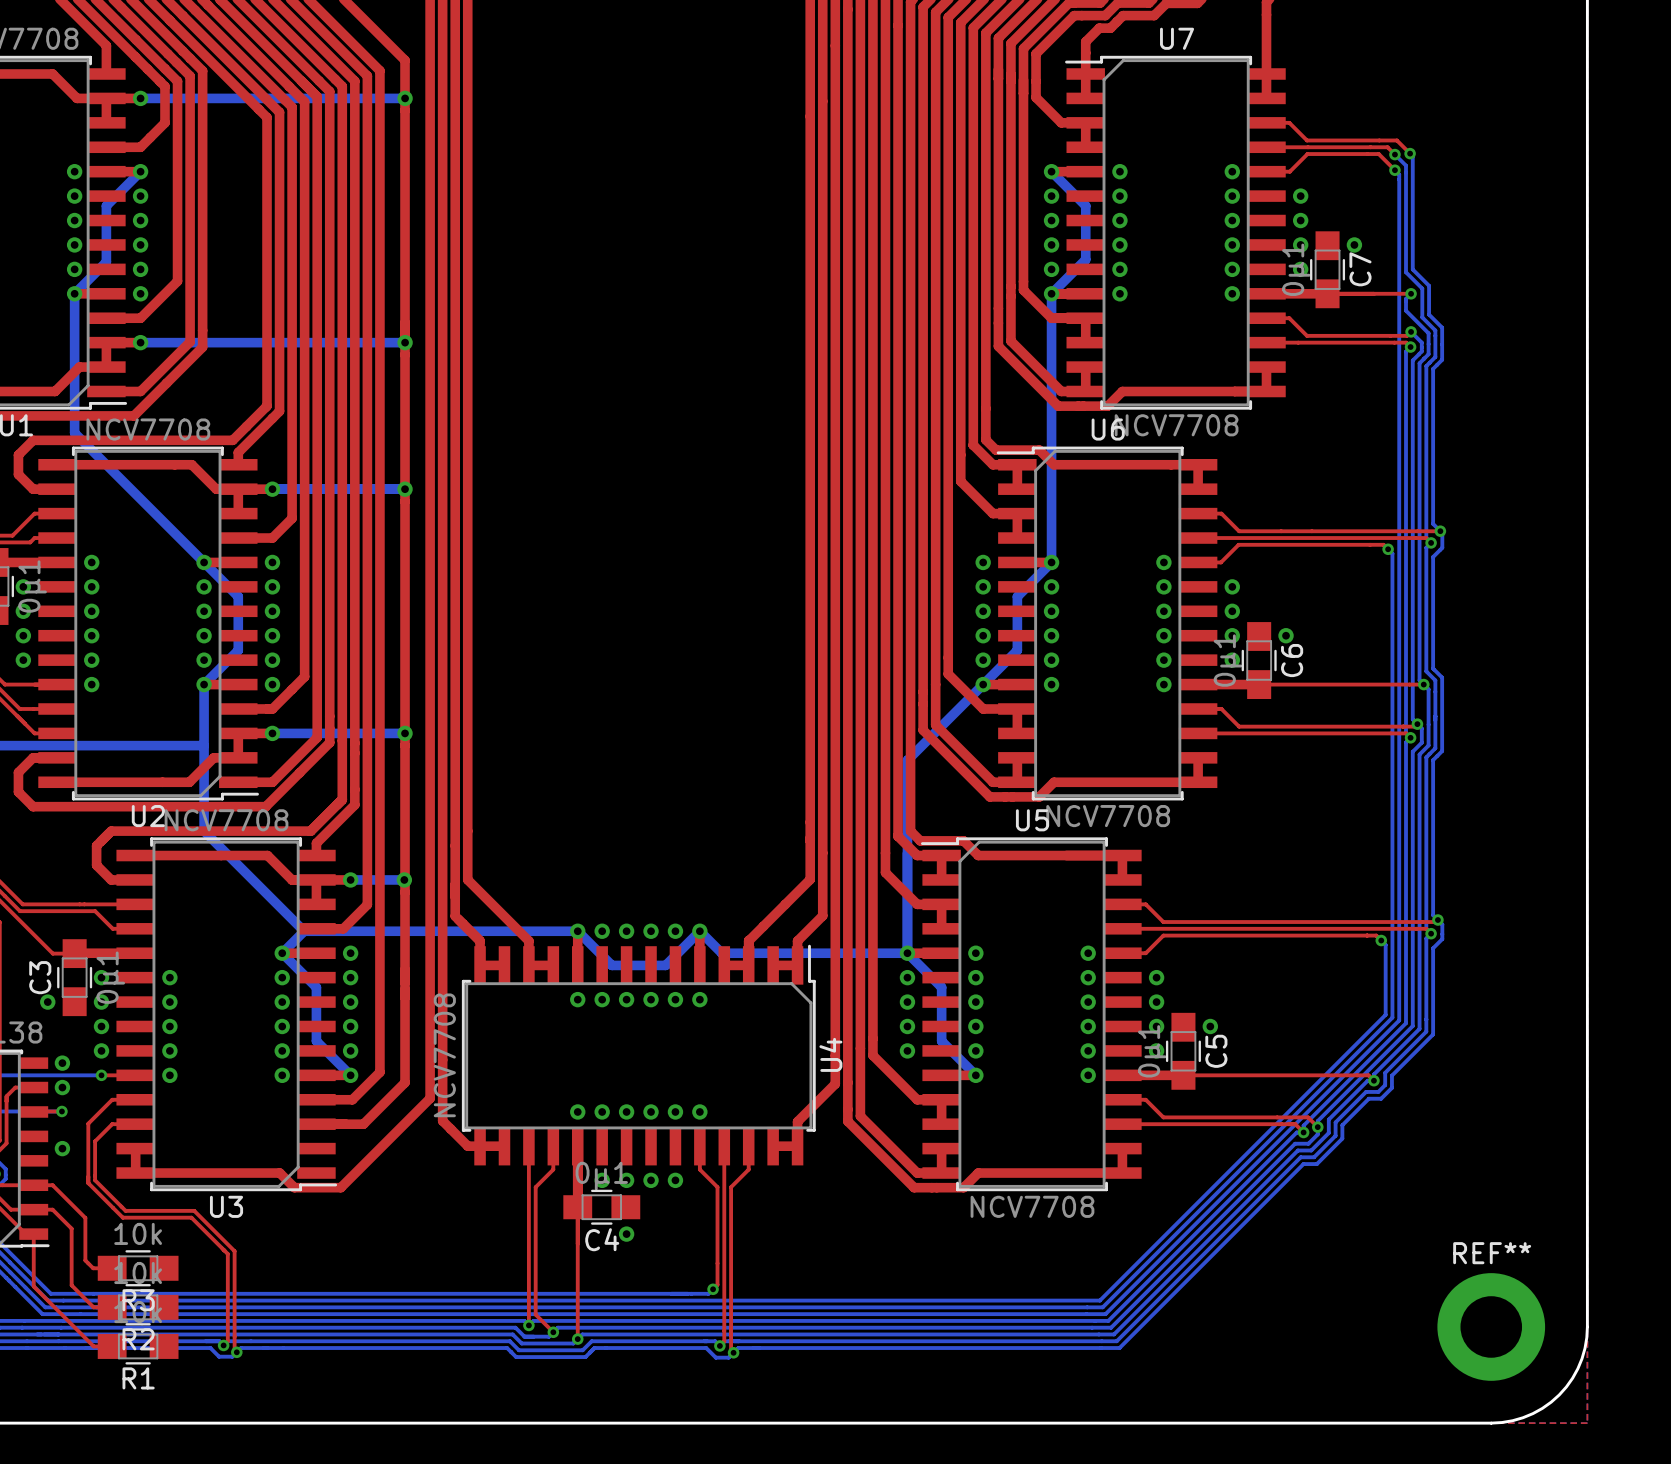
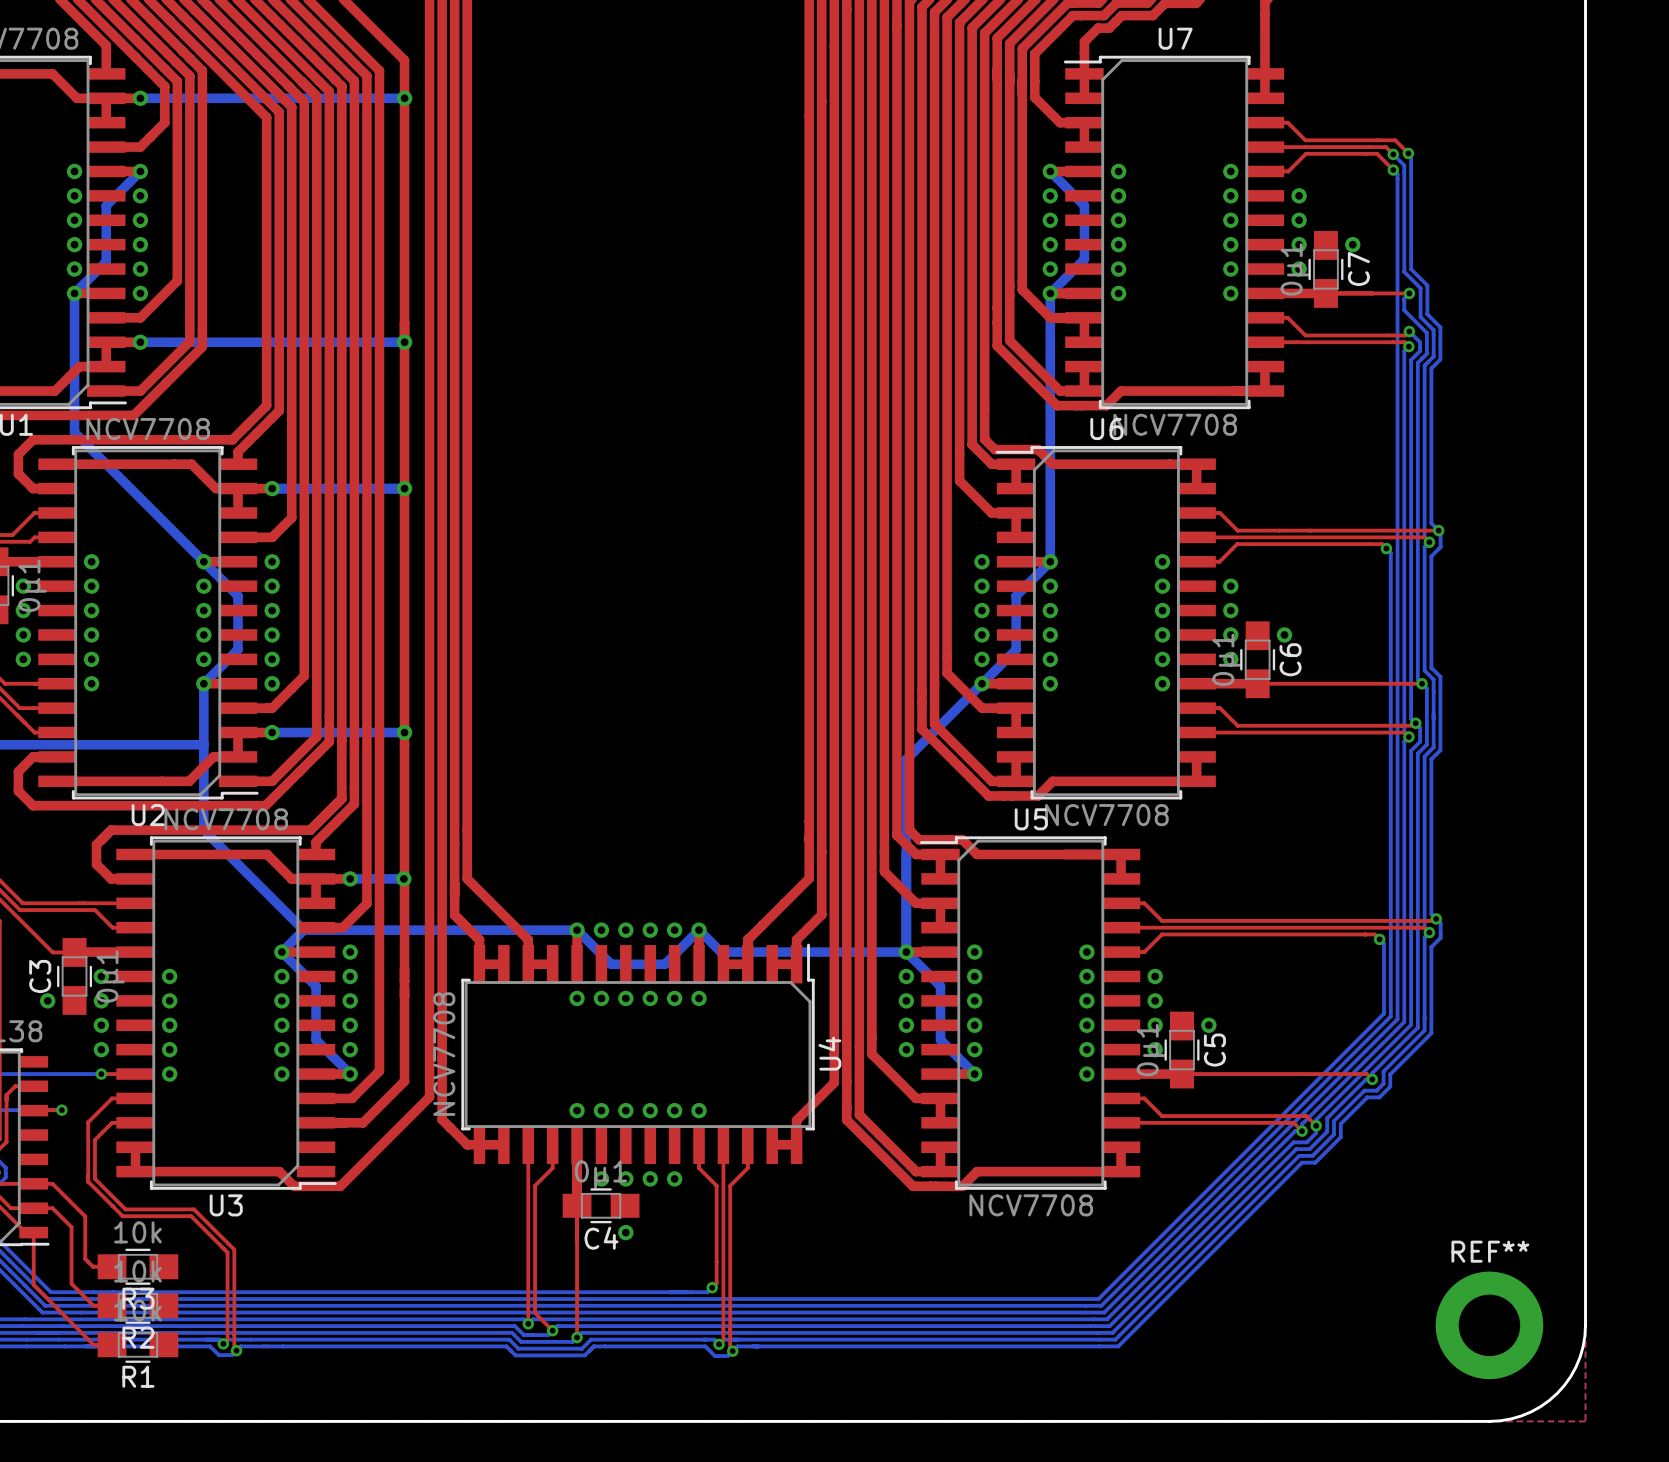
via: (62, 1063) -> none
via: (62, 1087) -> none
via: (62, 1148) -> none

